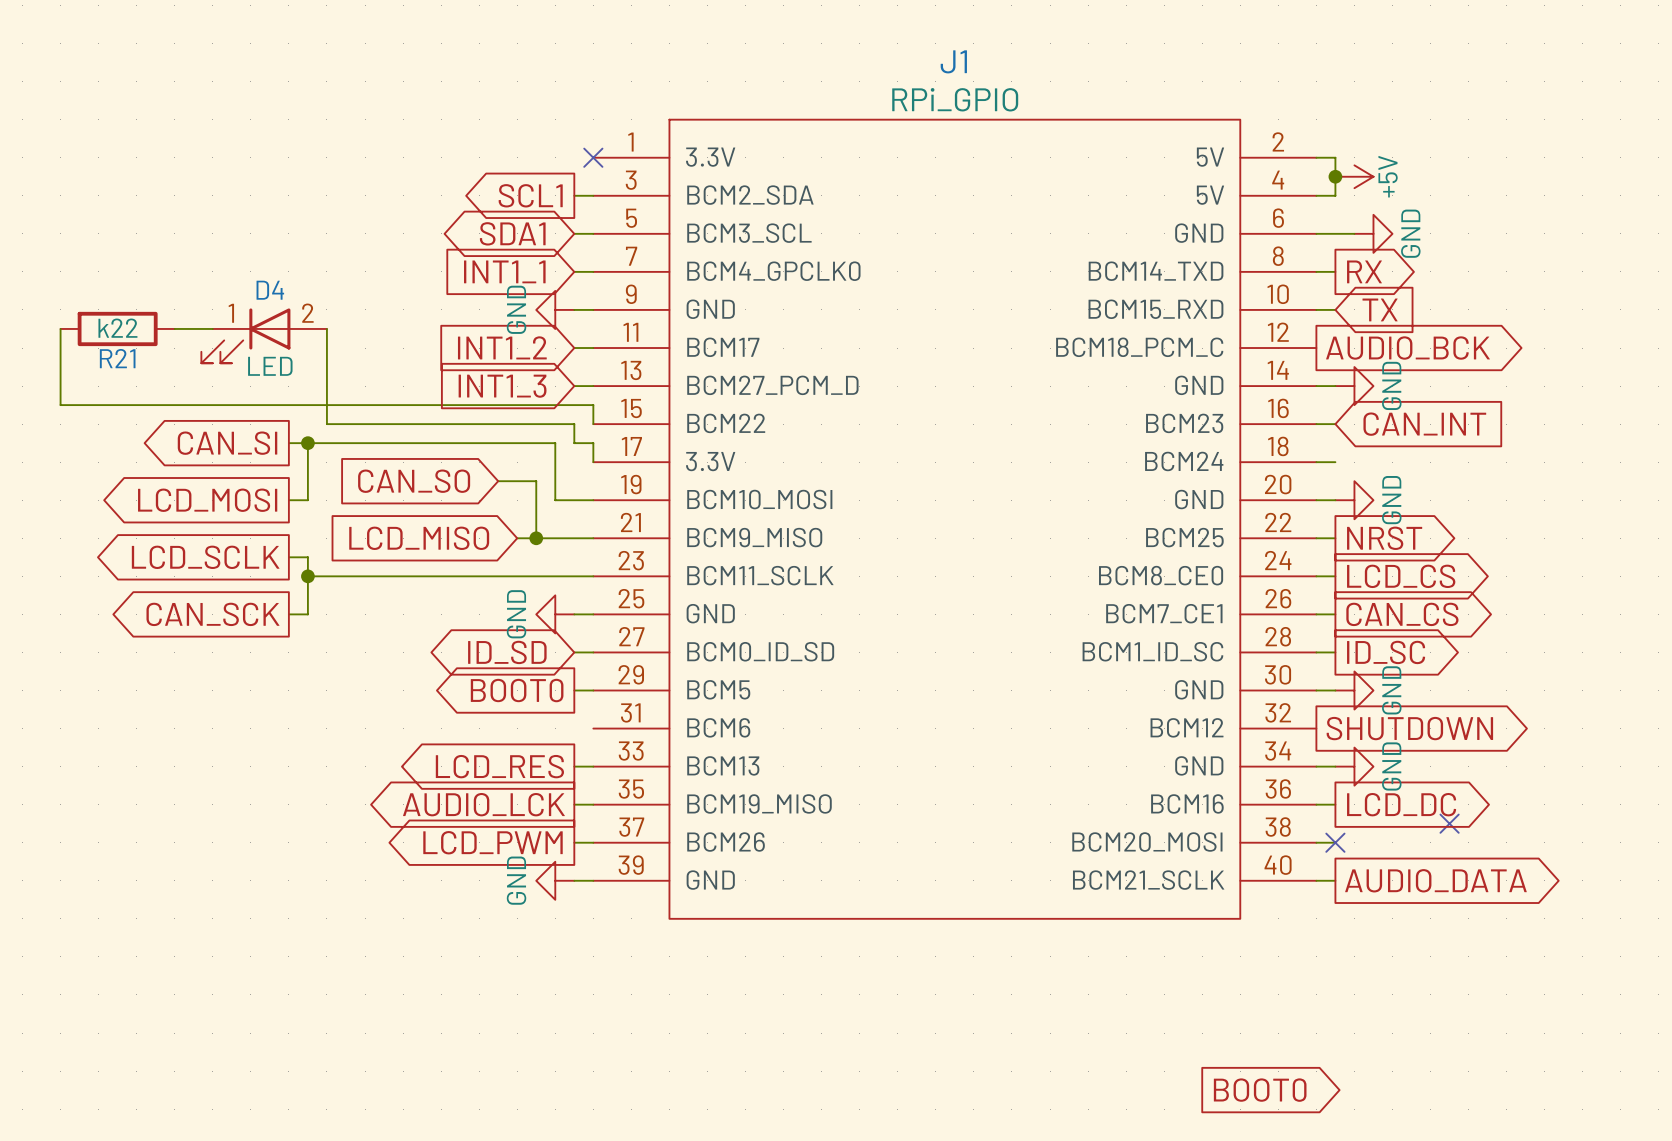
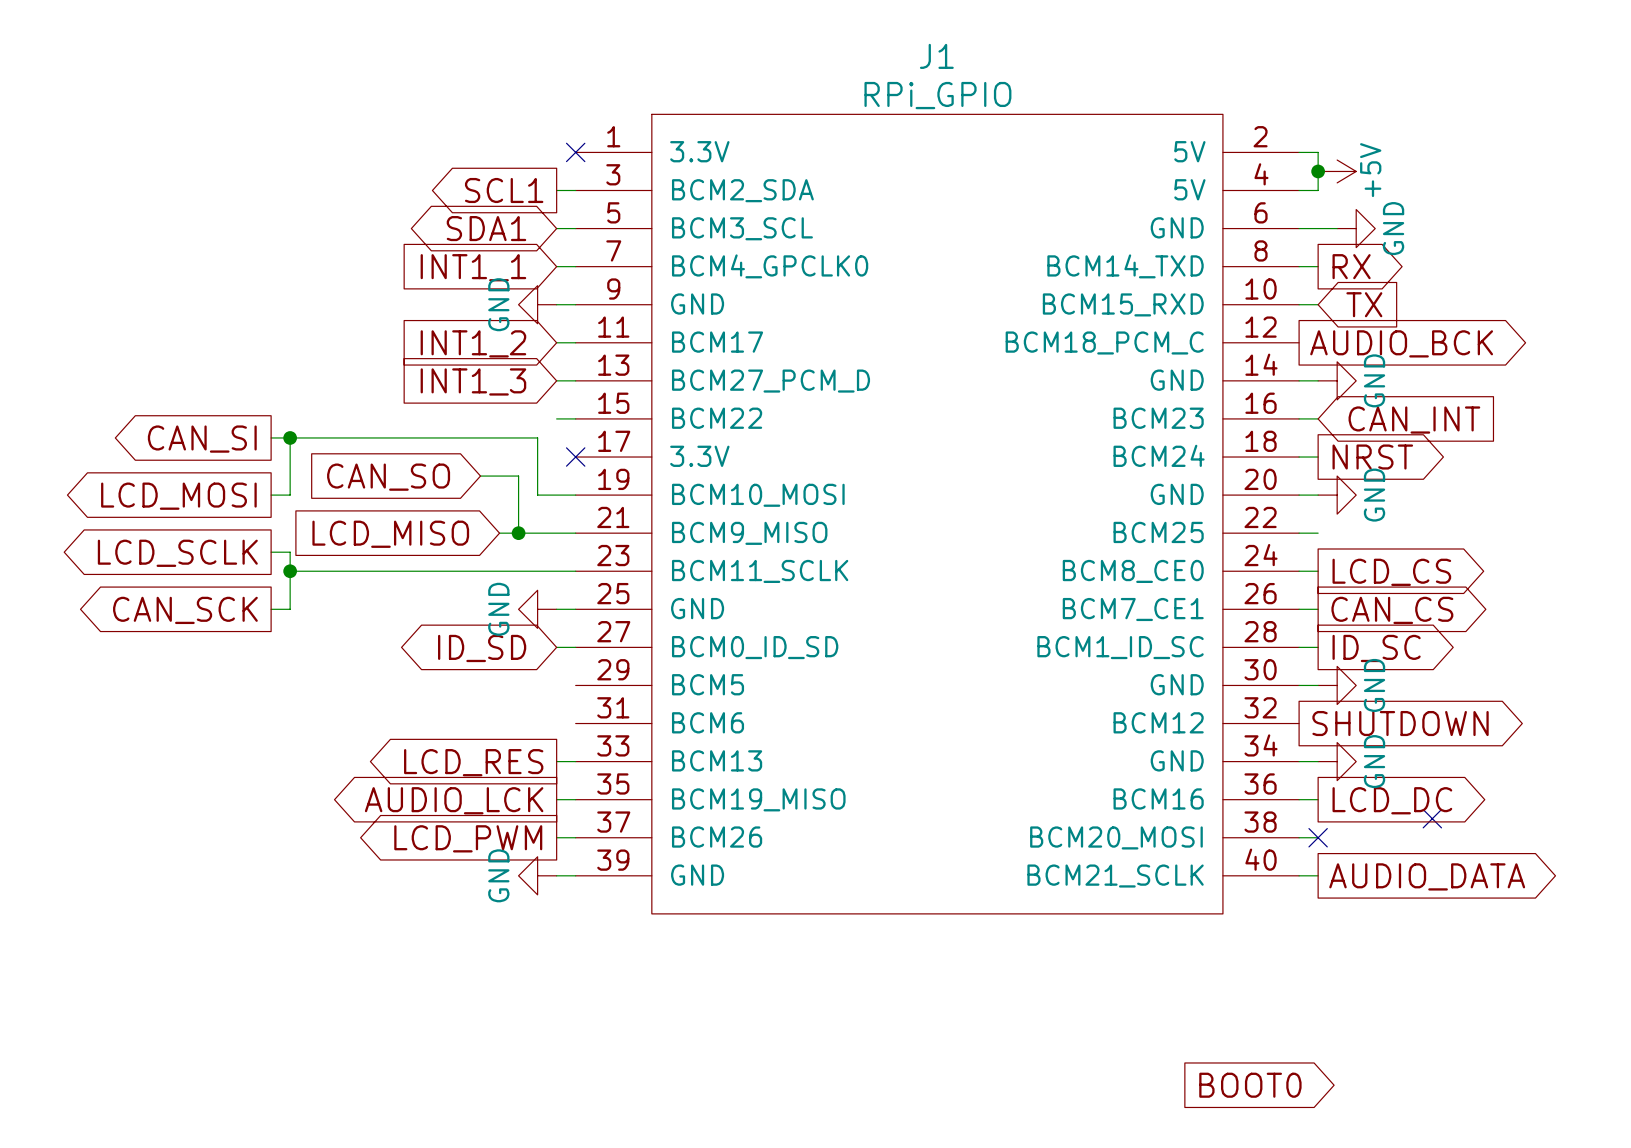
wire: (60, 328) (60, 405) (593, 405) (593, 424) -> (556, 418) (575, 418)
R21: k22 (117, 328) -> none
wire: (174, 328) (212, 328) -> none
wire: (326, 328) (326, 424) (574, 424) (574, 443) (593, 443) (593, 462) -> none
D4: LED (264, 335) -> none
no-connect mark: none -> (575, 457)
global label position: NRST (1384, 538) -> NRST (1372, 457)
global label: BOOT0 (517, 690) -> none
wire: (574, 690) (593, 690) -> none

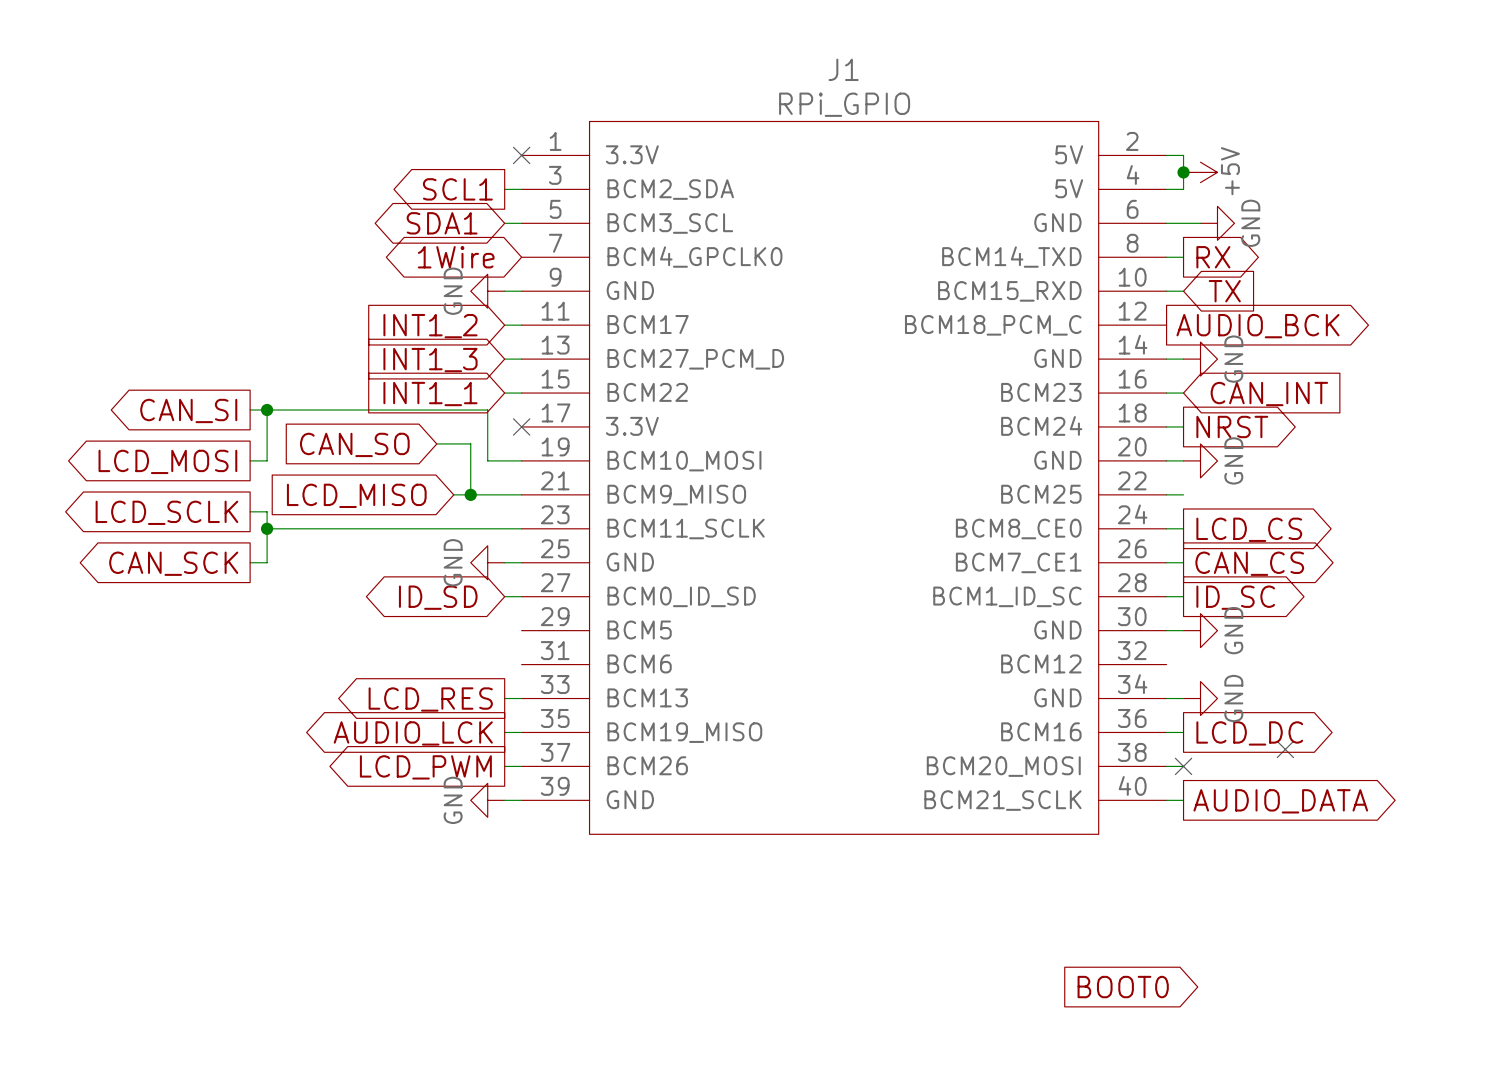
global label: none -> 1Wire (456, 257)
wire: (556, 266) (575, 266) -> none
global label position: INT1_1 (473, 267) -> INT1_1 (430, 394)
global label: SHUTDOWN (1400, 723) -> none

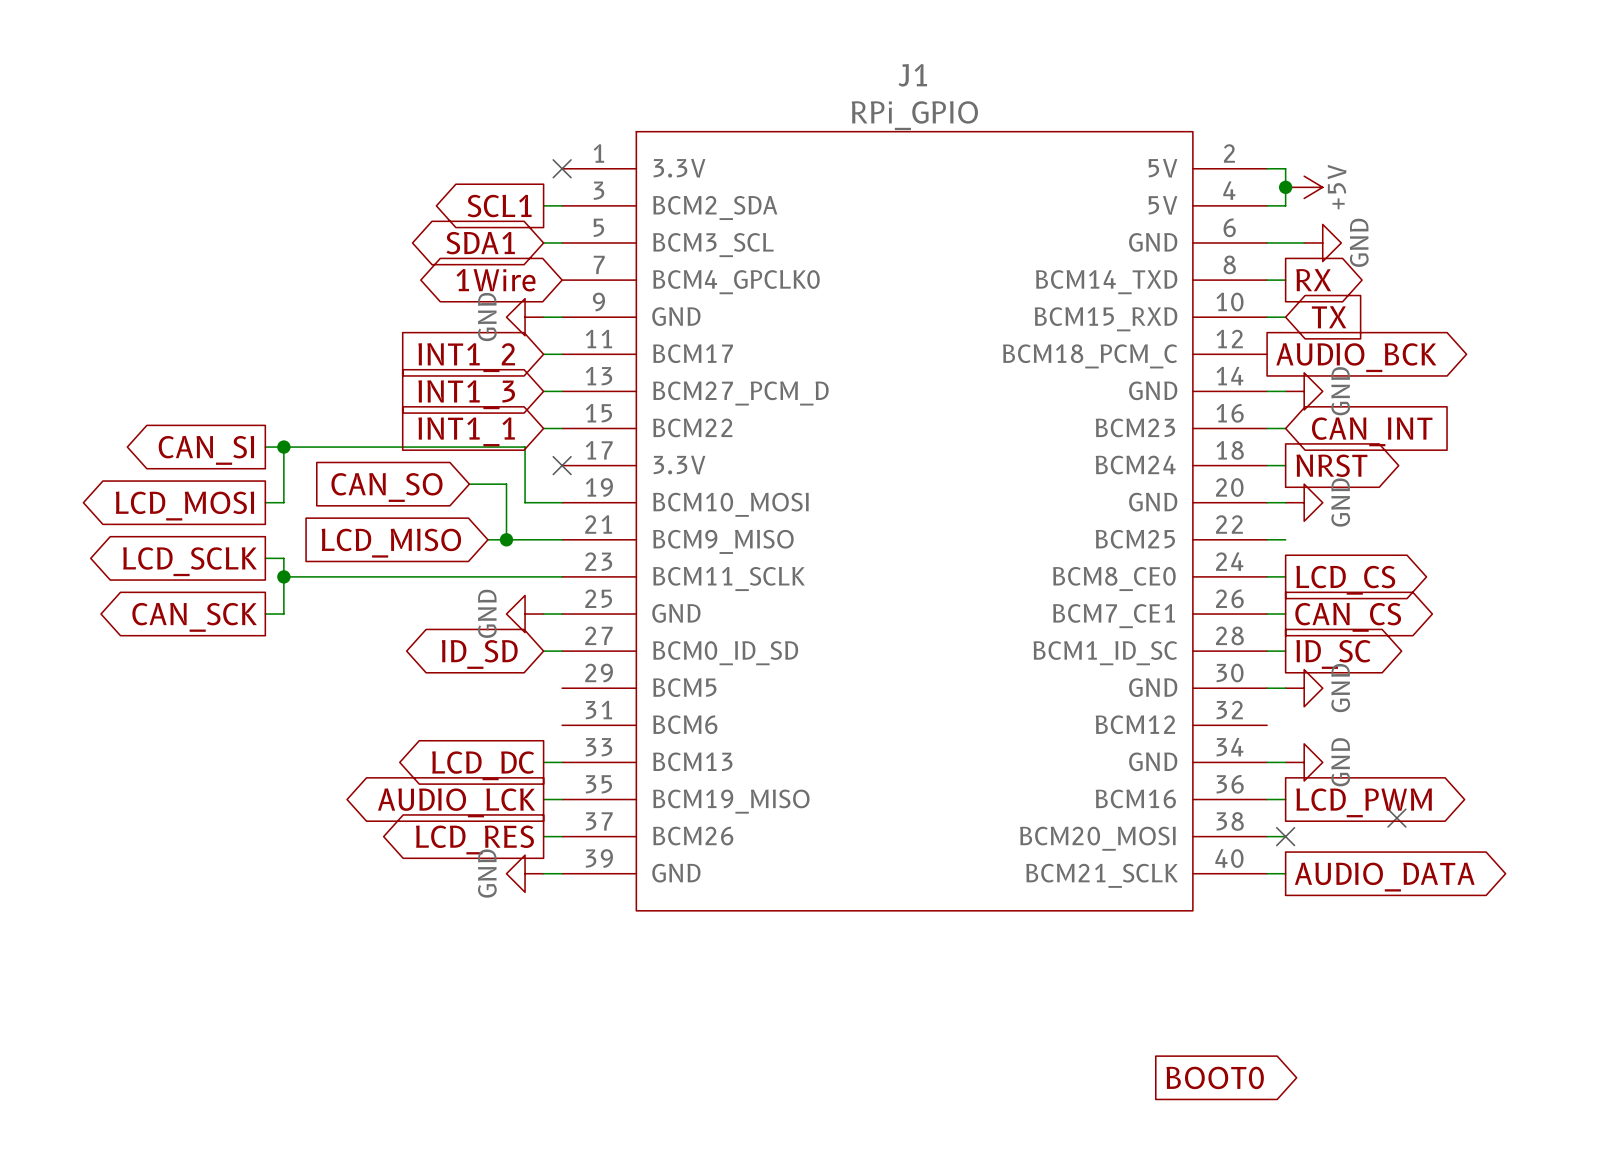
global label: LCD_RES (430, 699) -> LCD_DC (483, 765)
global label: LCD_DC (1249, 733) -> LCD_PWM (1364, 802)
global label: LCD_PWM (425, 767) -> LCD_RES (474, 839)

